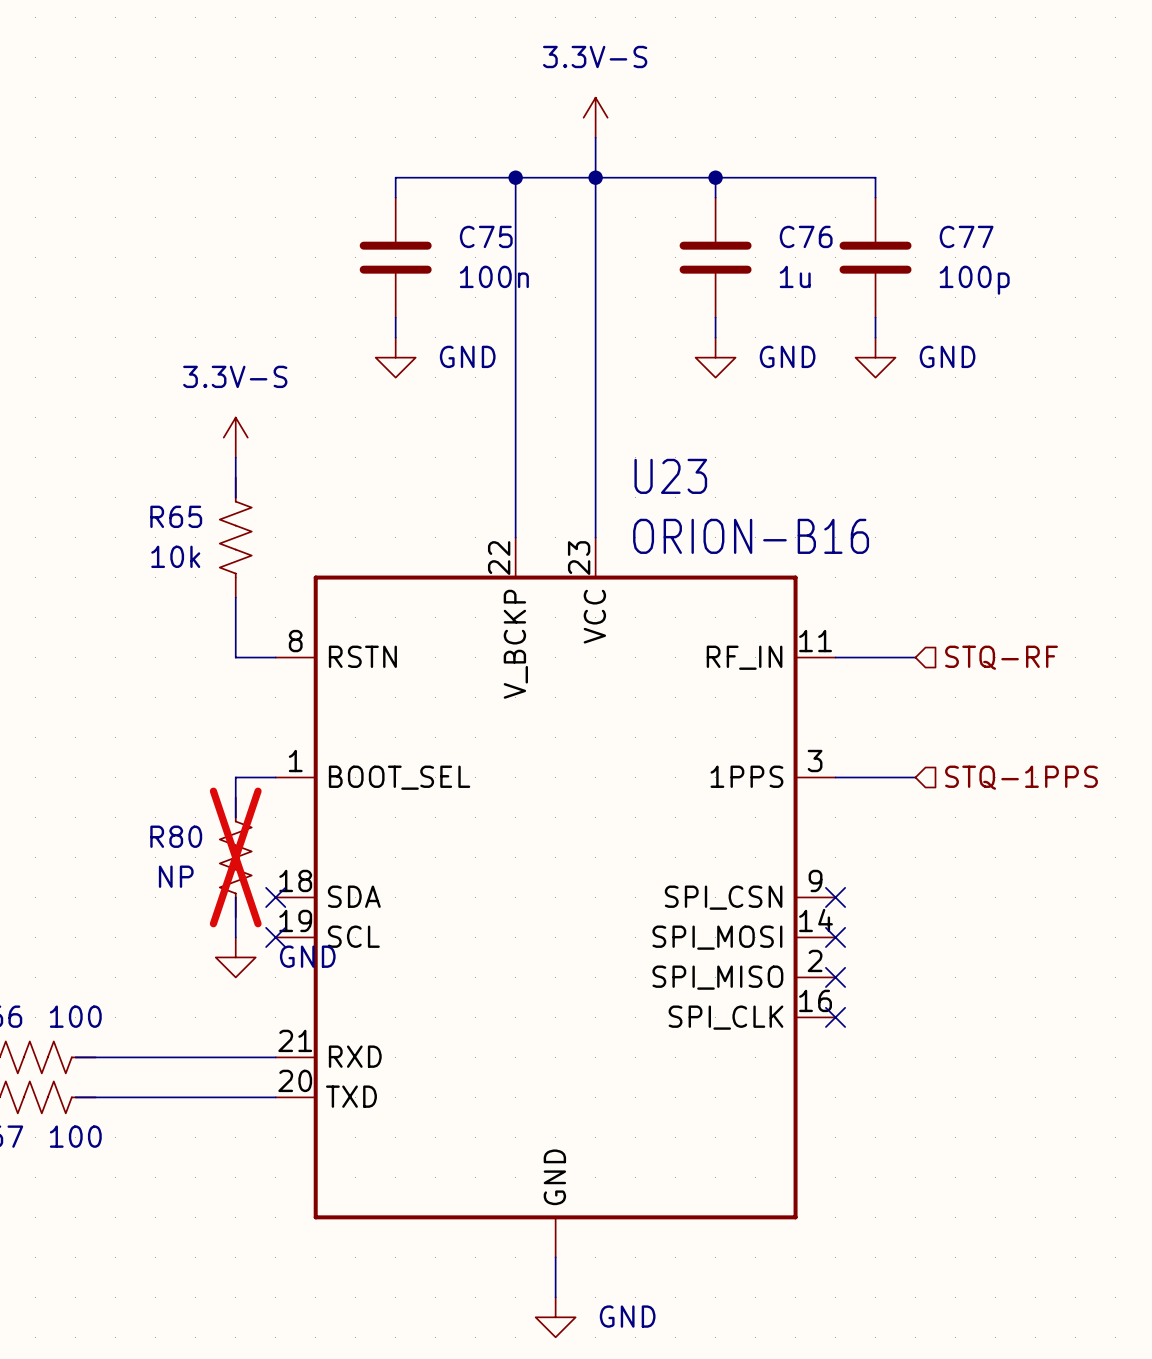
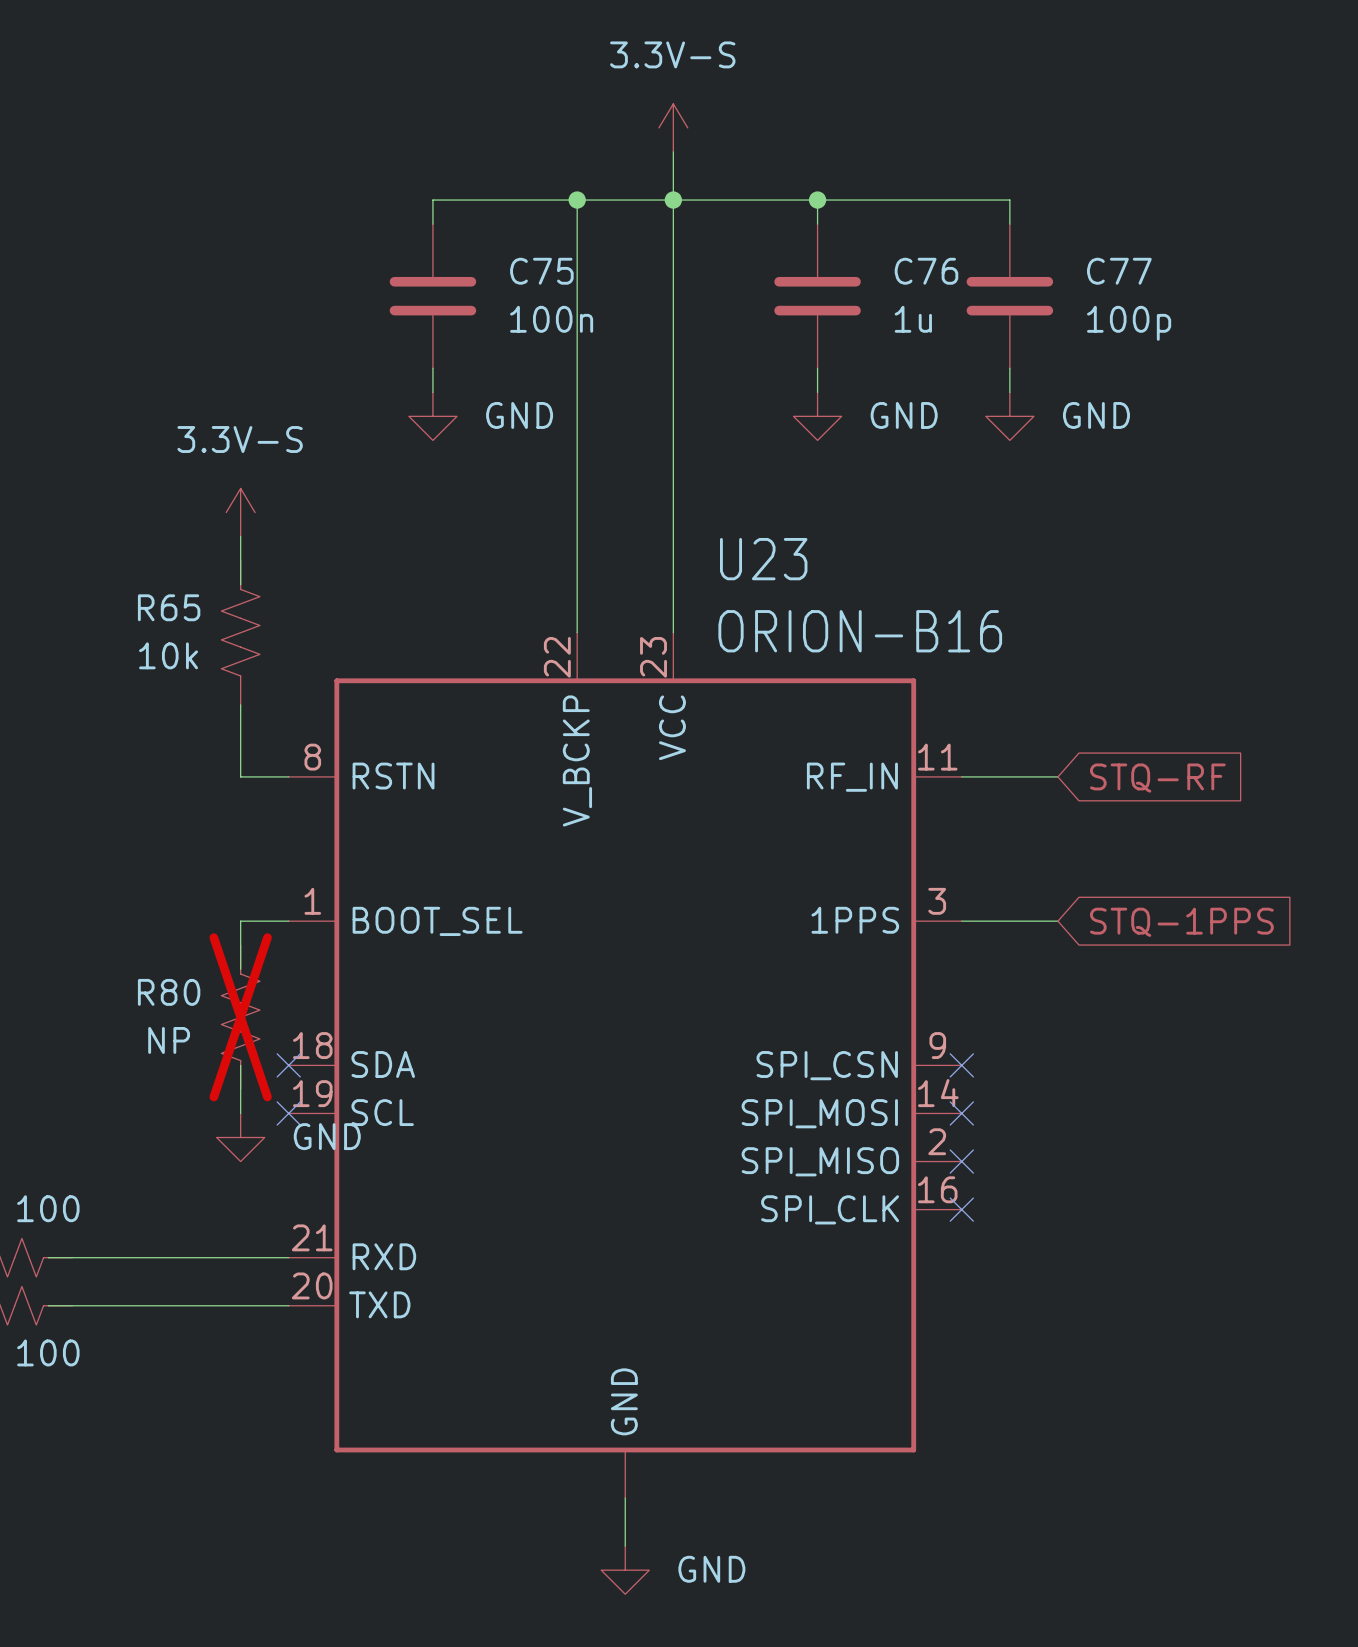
hierarchical label: STQ-RF (1001, 657) -> none
global label: none -> STQ-RF (1157, 778)
hierarchical label: STQ-1PPS (1021, 777) -> none
global label: none -> STQ-1PPS (1181, 922)

